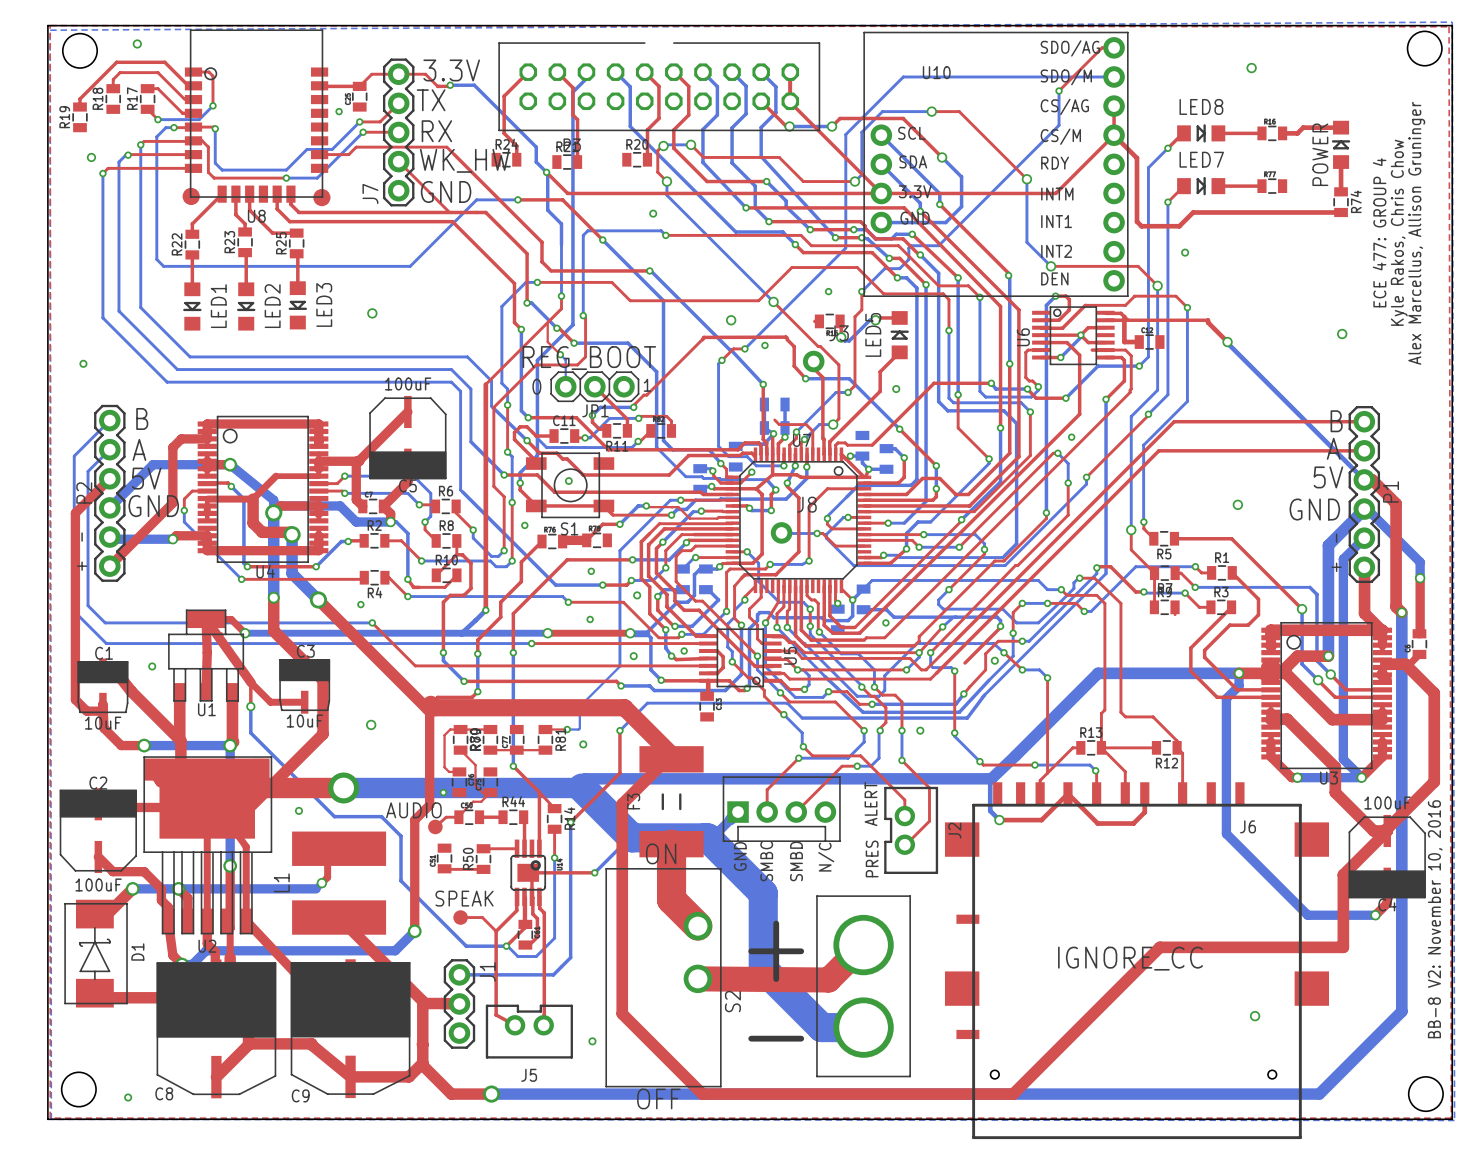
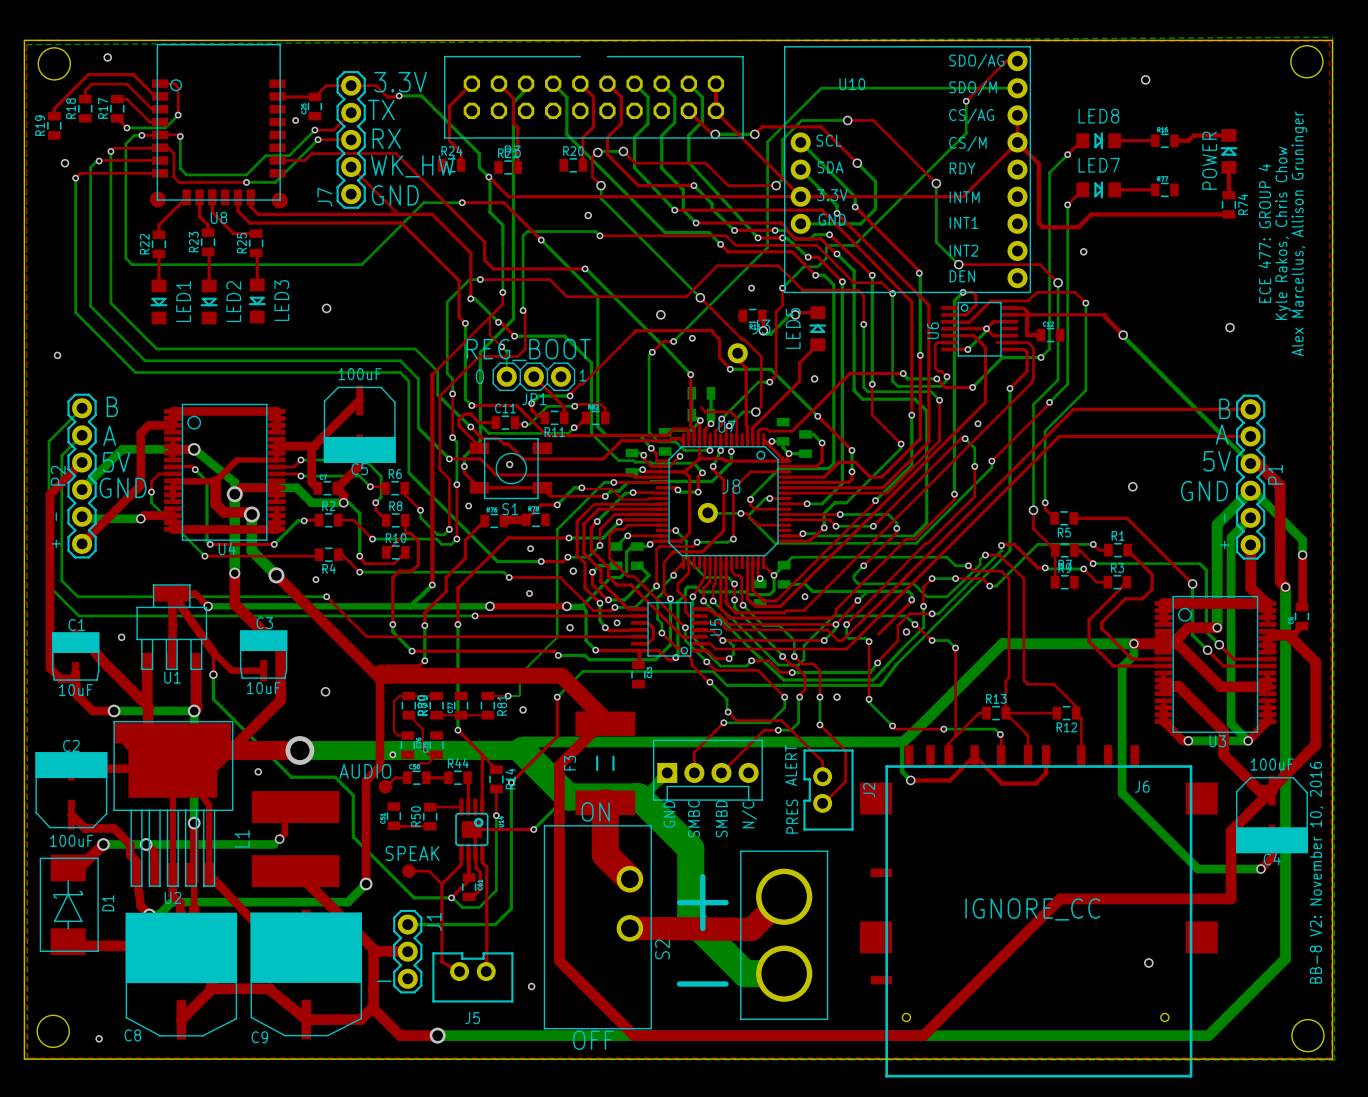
text: none -> - (384, 981)

